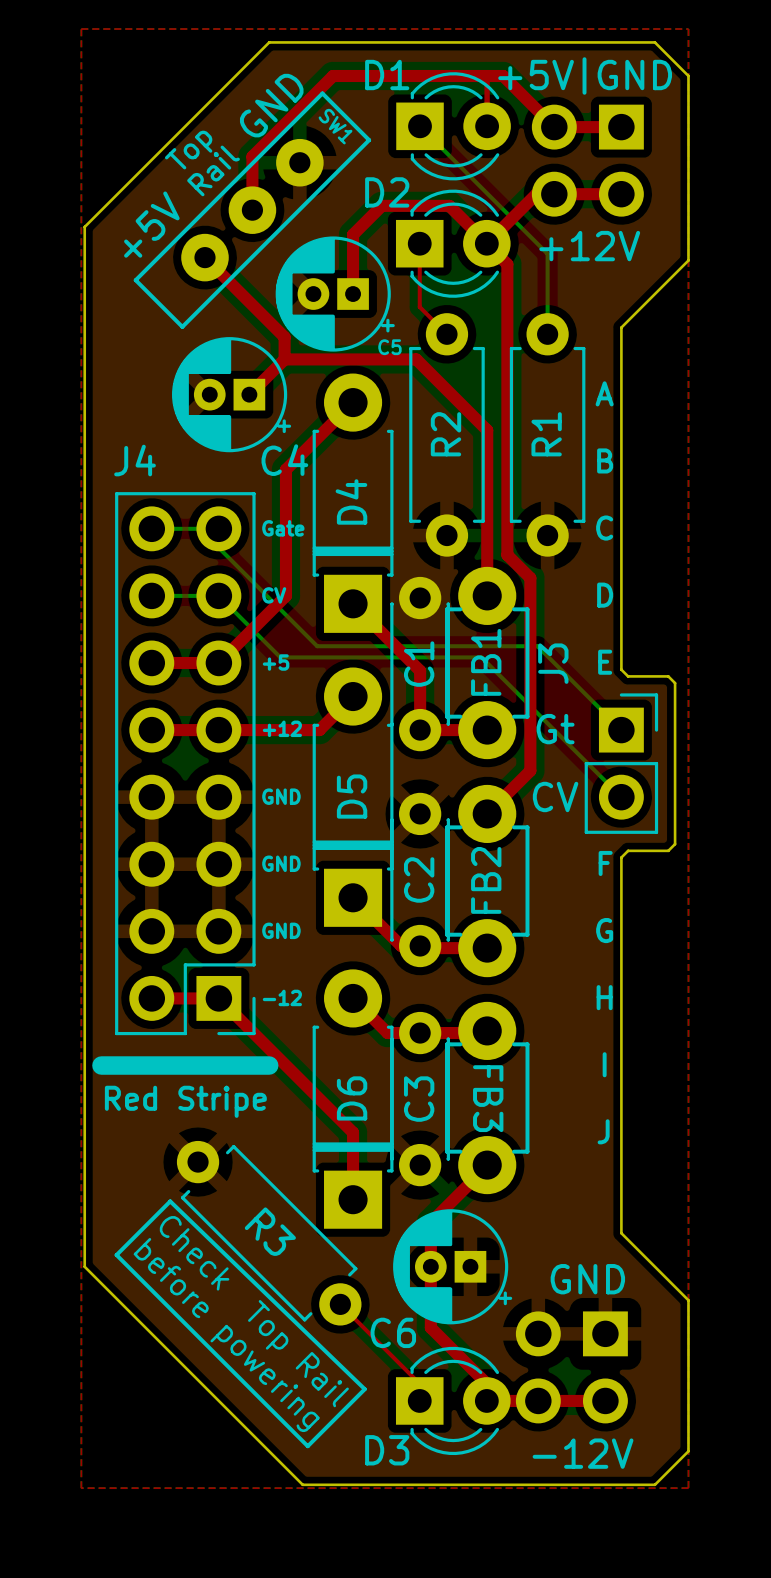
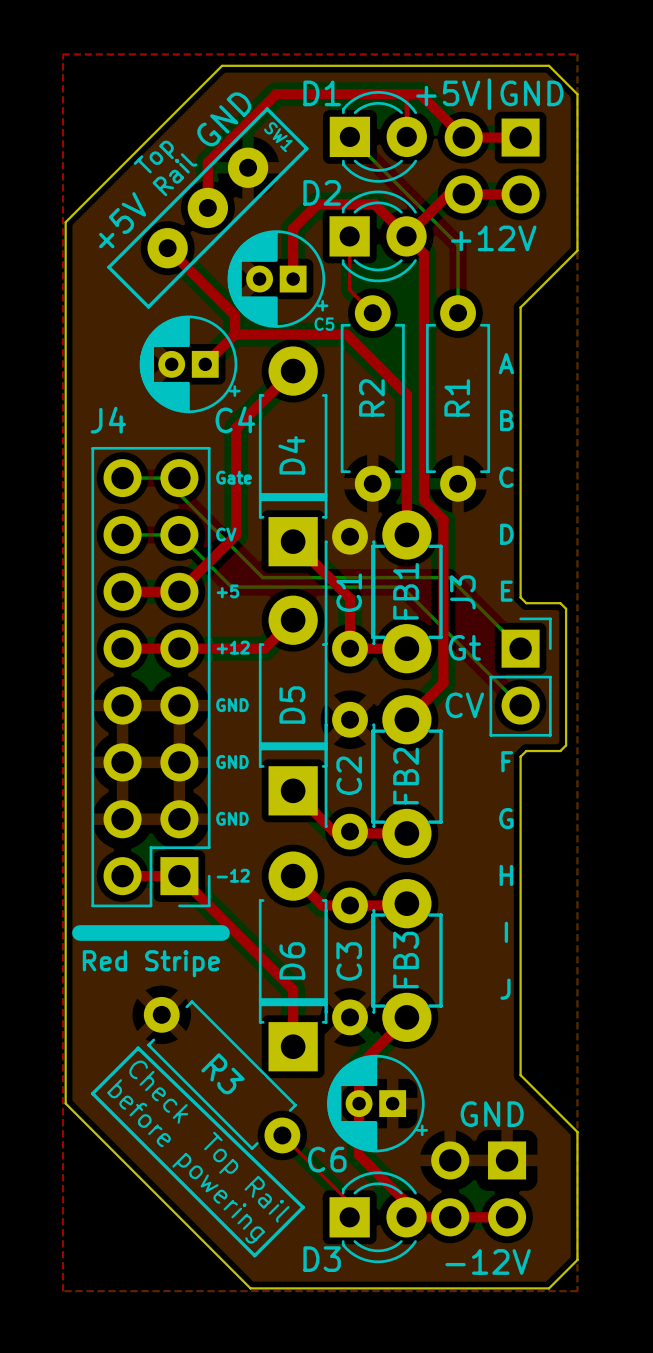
FB3 name rotation: 0° (488, 1098) -> 180° (406, 959)

